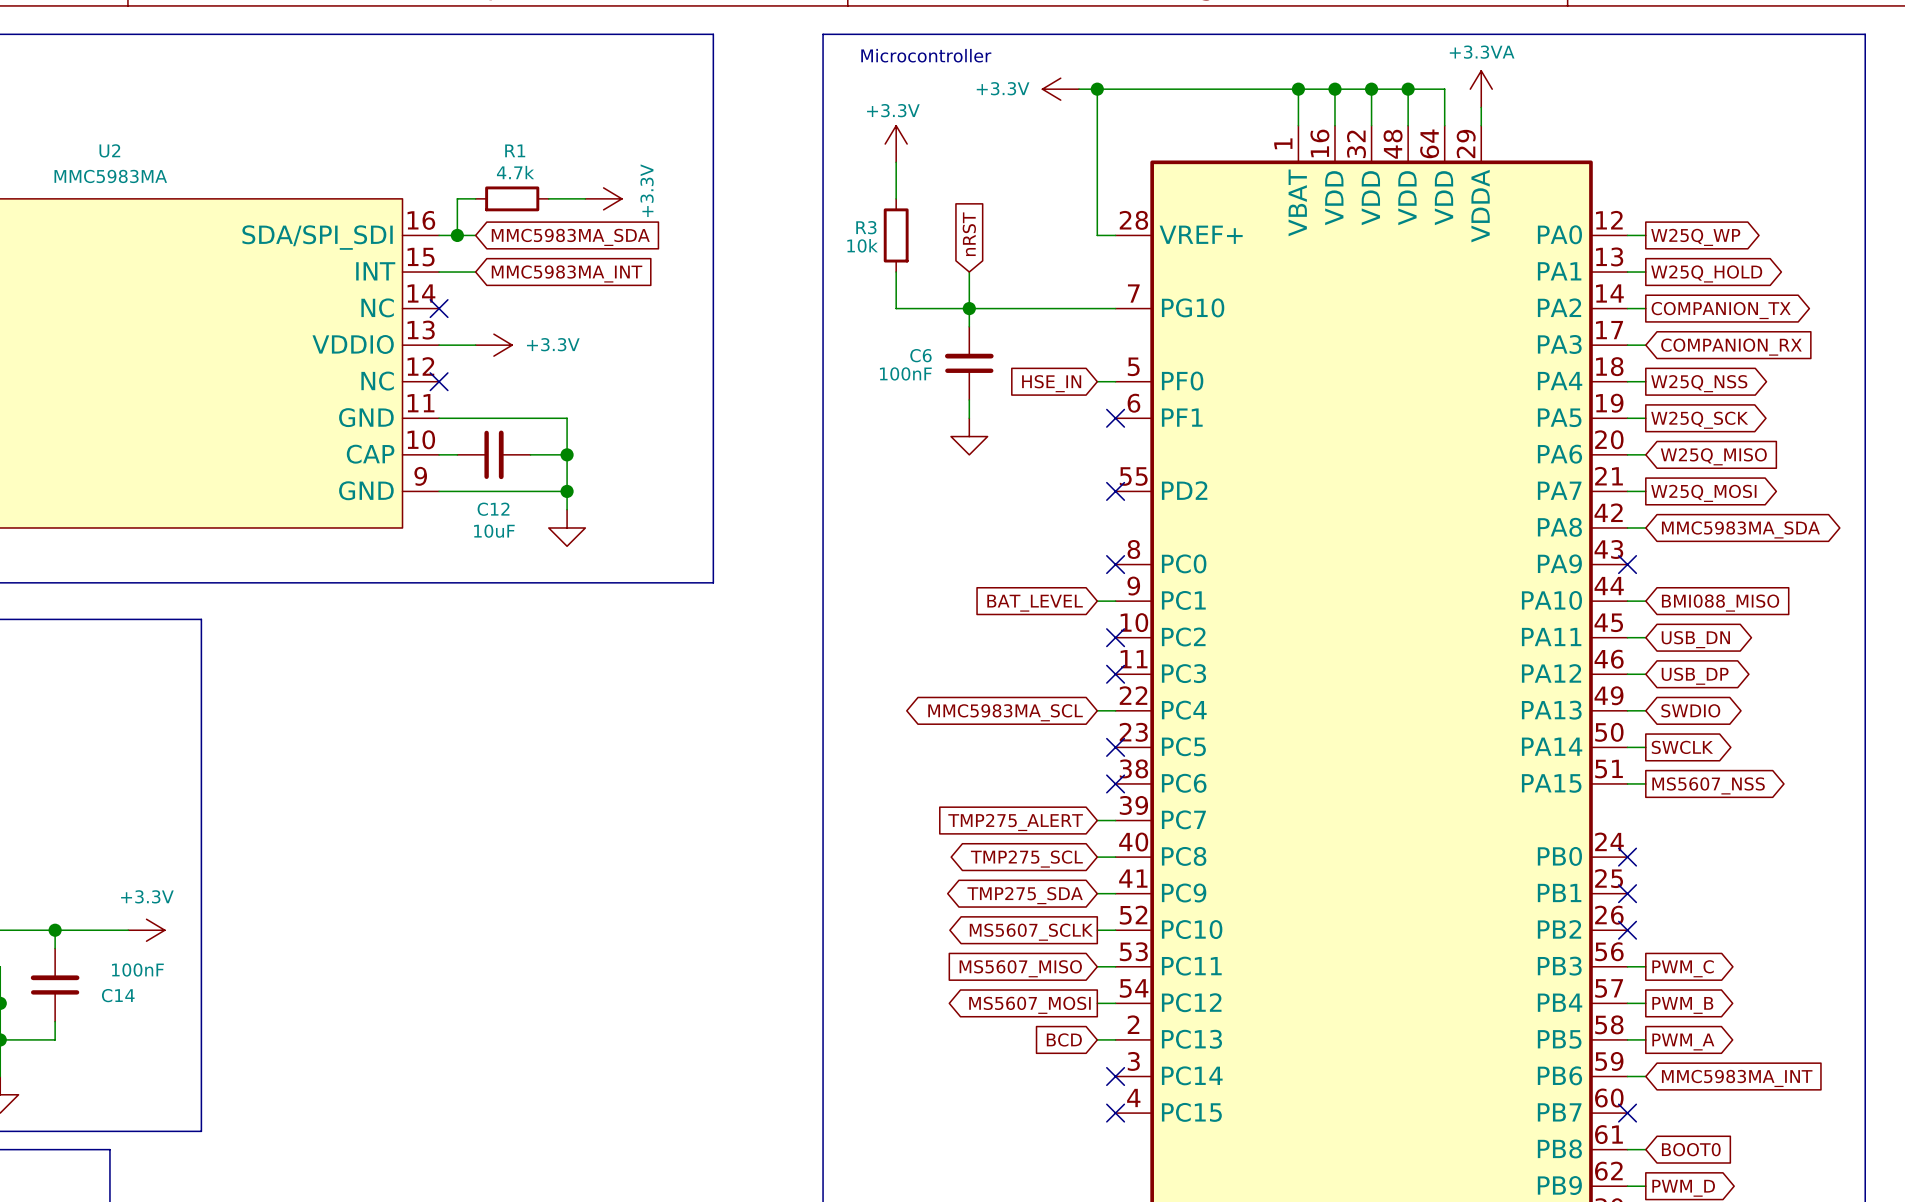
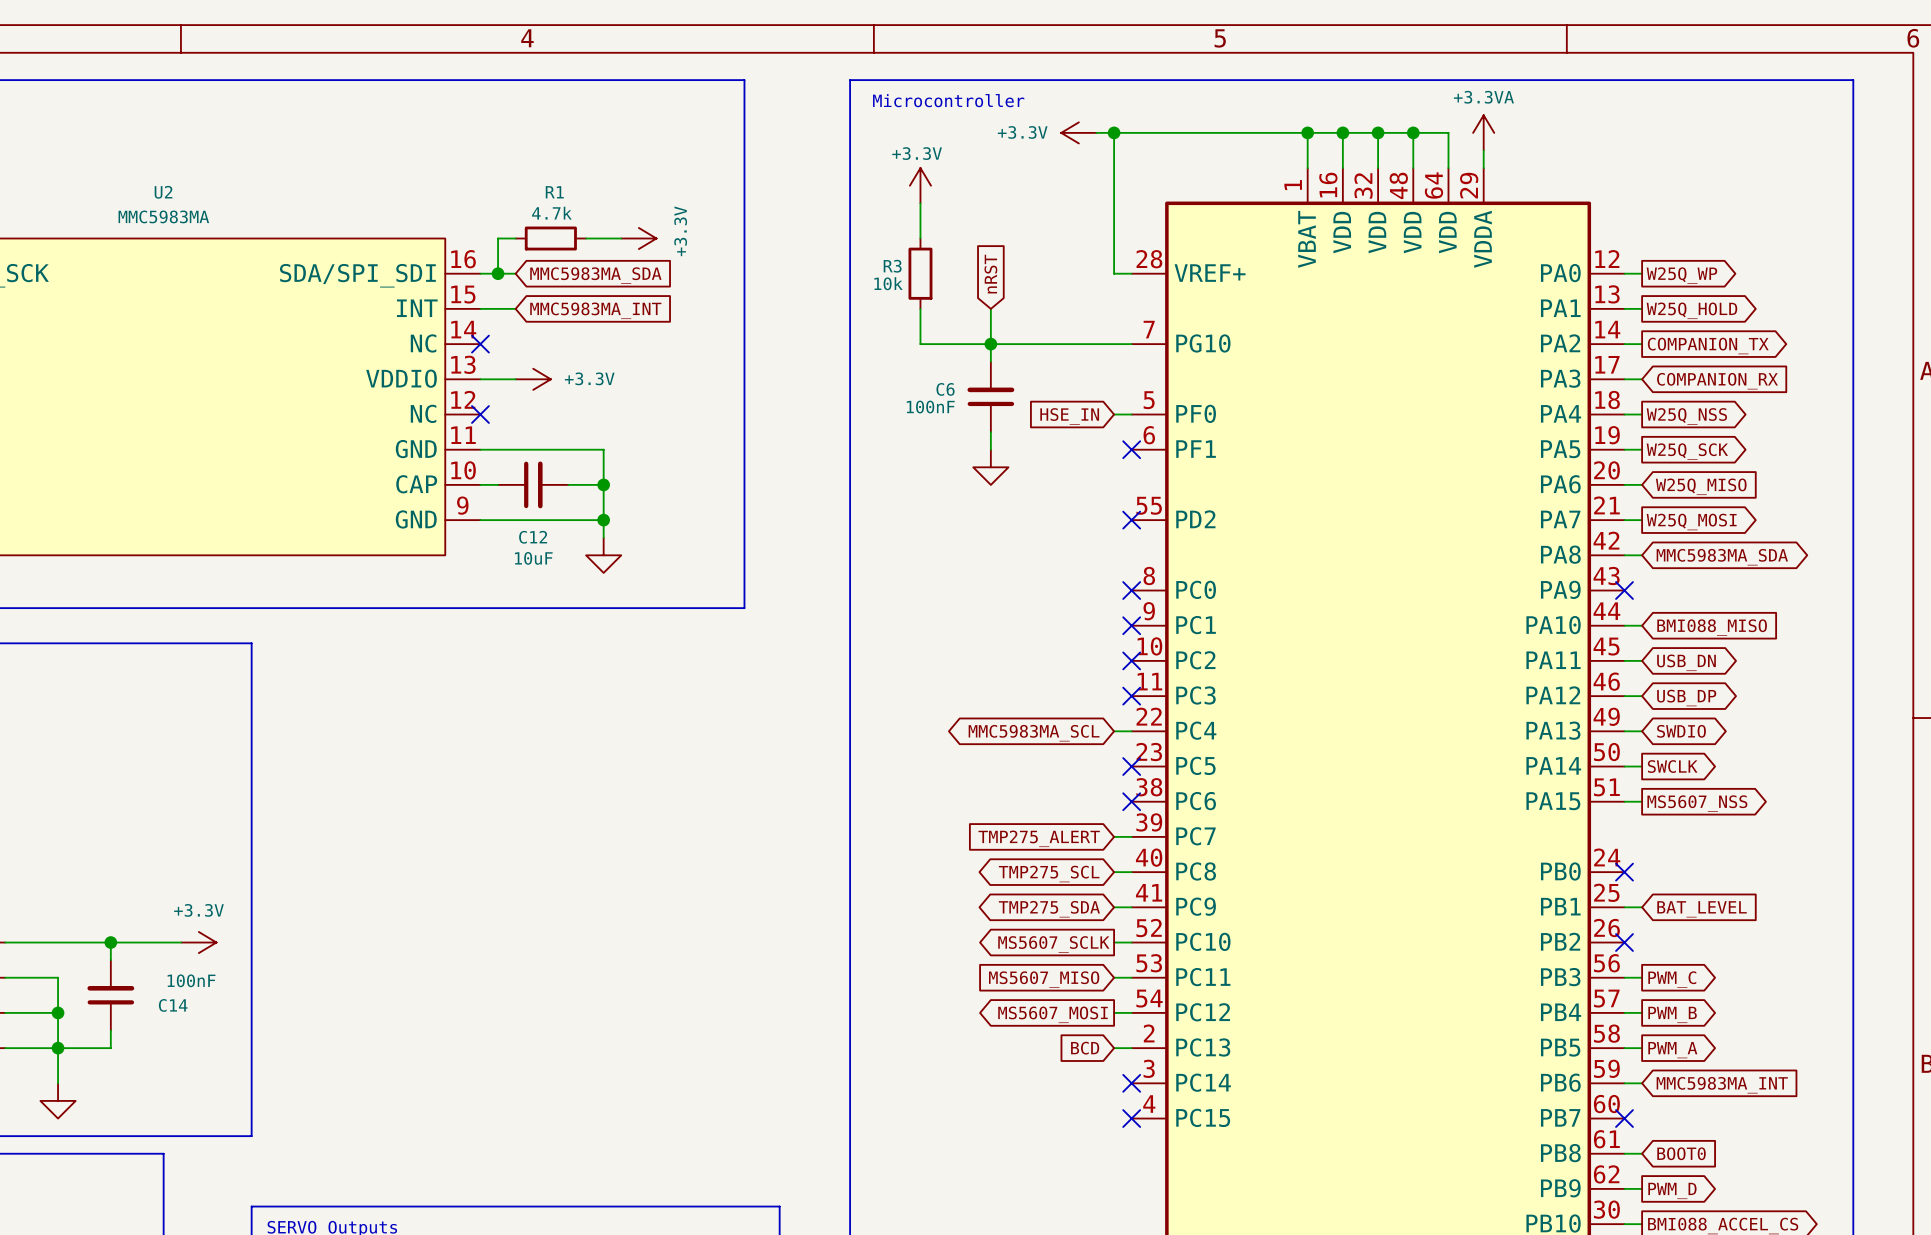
wire: (1097, 601) (1115, 601) -> none
no-connect mark: none -> (1131, 625)
global label: BAT_LEVEL (1035, 603) -> none
wire: none -> (1624, 907) (1642, 907)
no-connect mark: (1627, 893) -> none
global label: none -> BAT_LEVEL (1702, 909)

